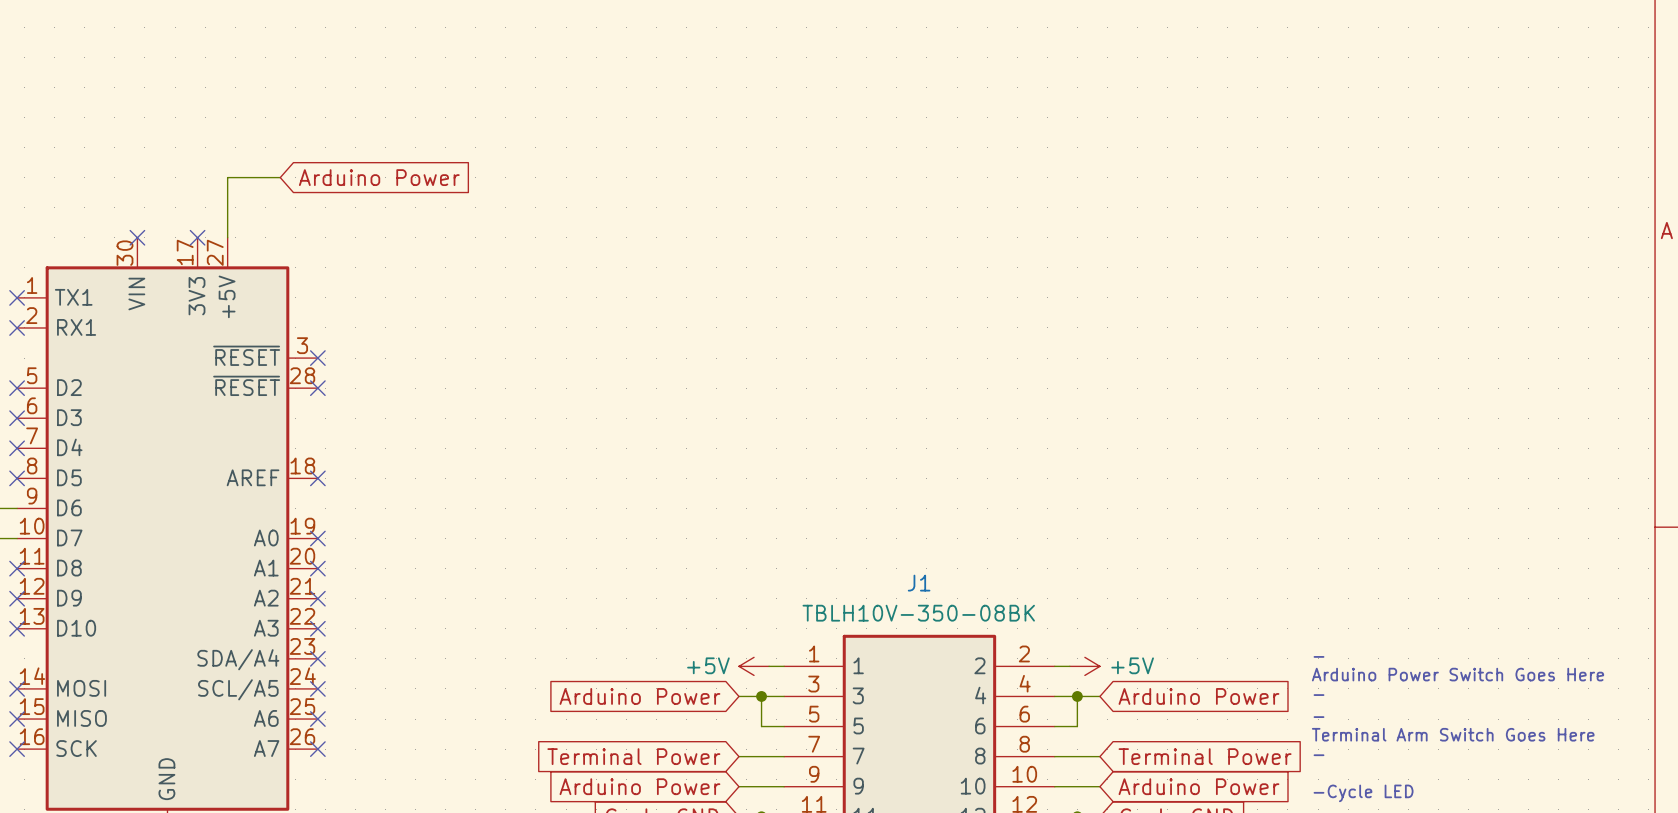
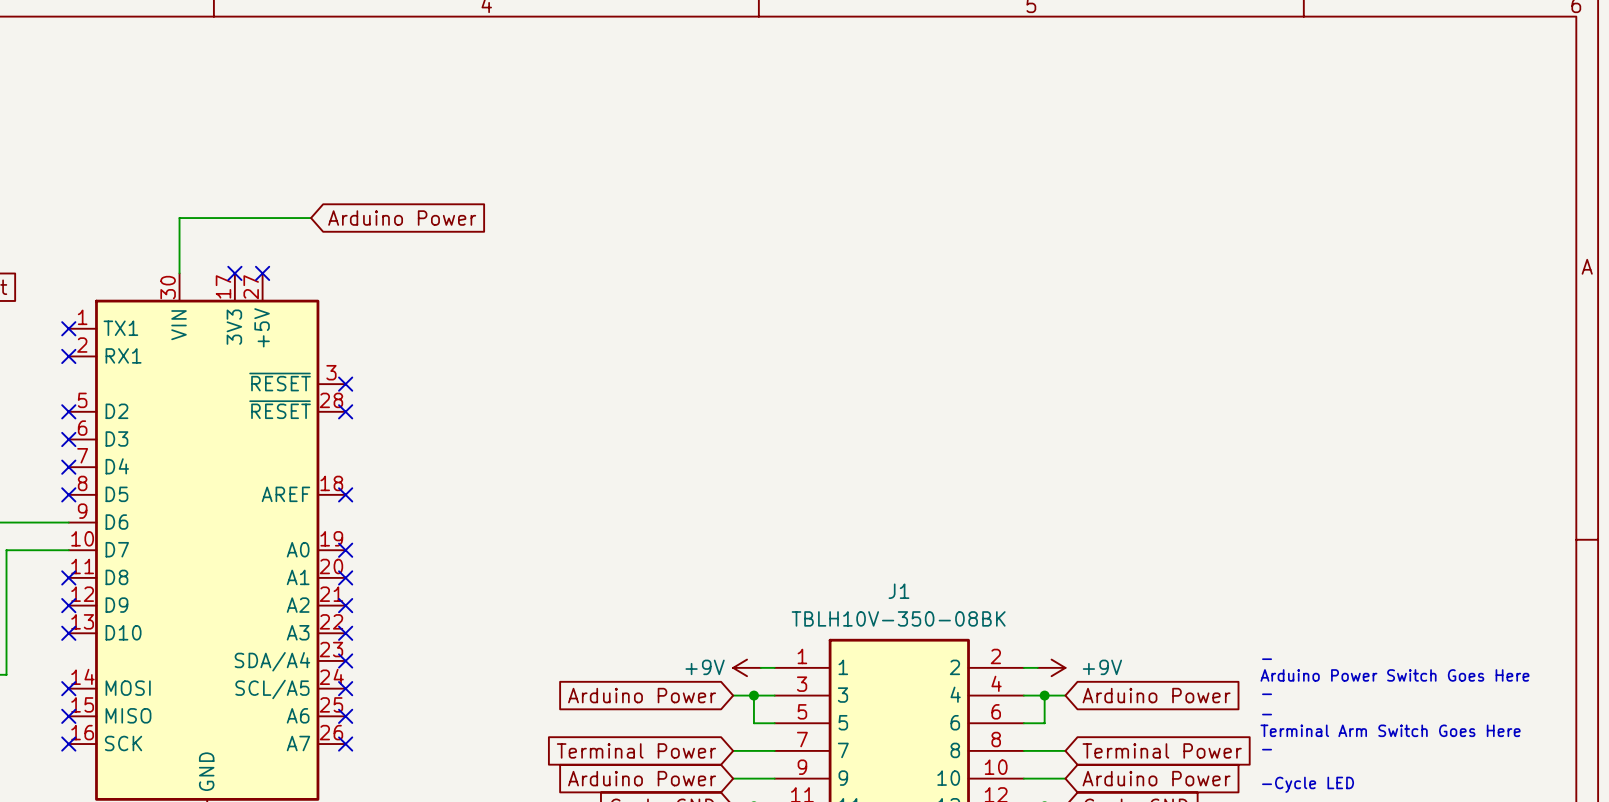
wire: (227, 177) (227, 237) -> (262, 218) (179, 218) (179, 273)
no-connect mark: (137, 237) -> none
no-connect mark: none -> (262, 273)
power symbol: +5V (754, 666) -> +9V (747, 667)
power symbol: +5V (1084, 666) -> +9V (1051, 667)

